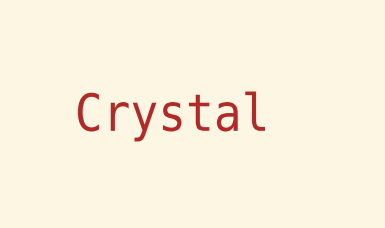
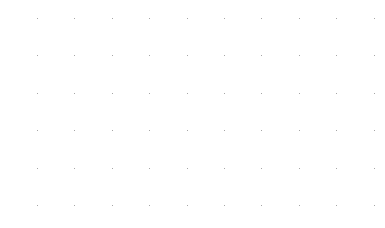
text: Crystal (171, 116) -> none

